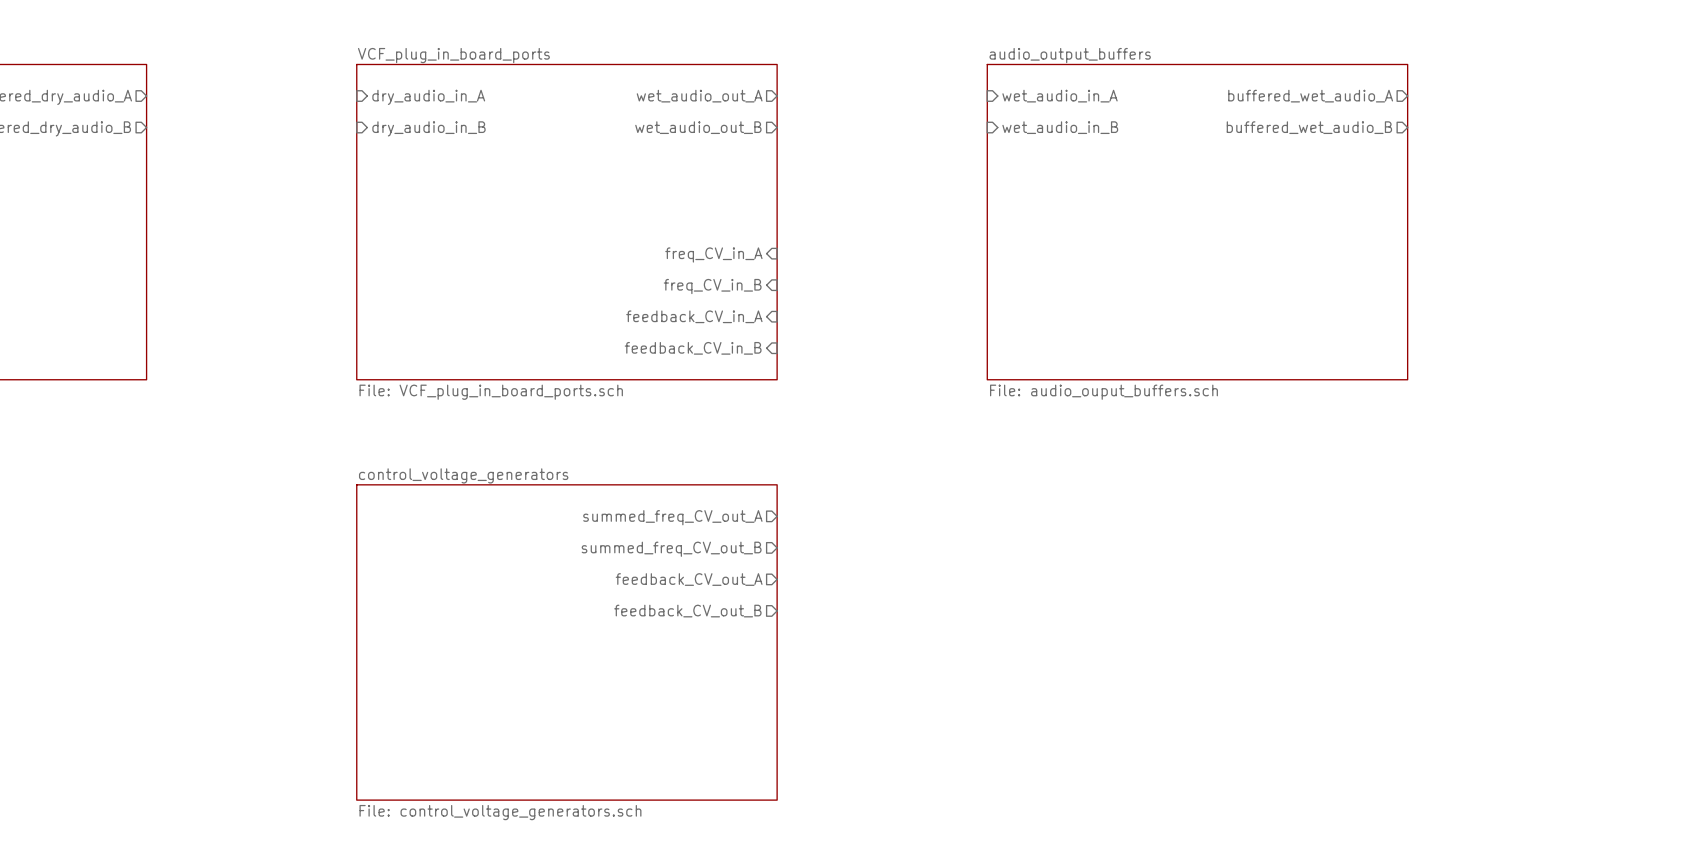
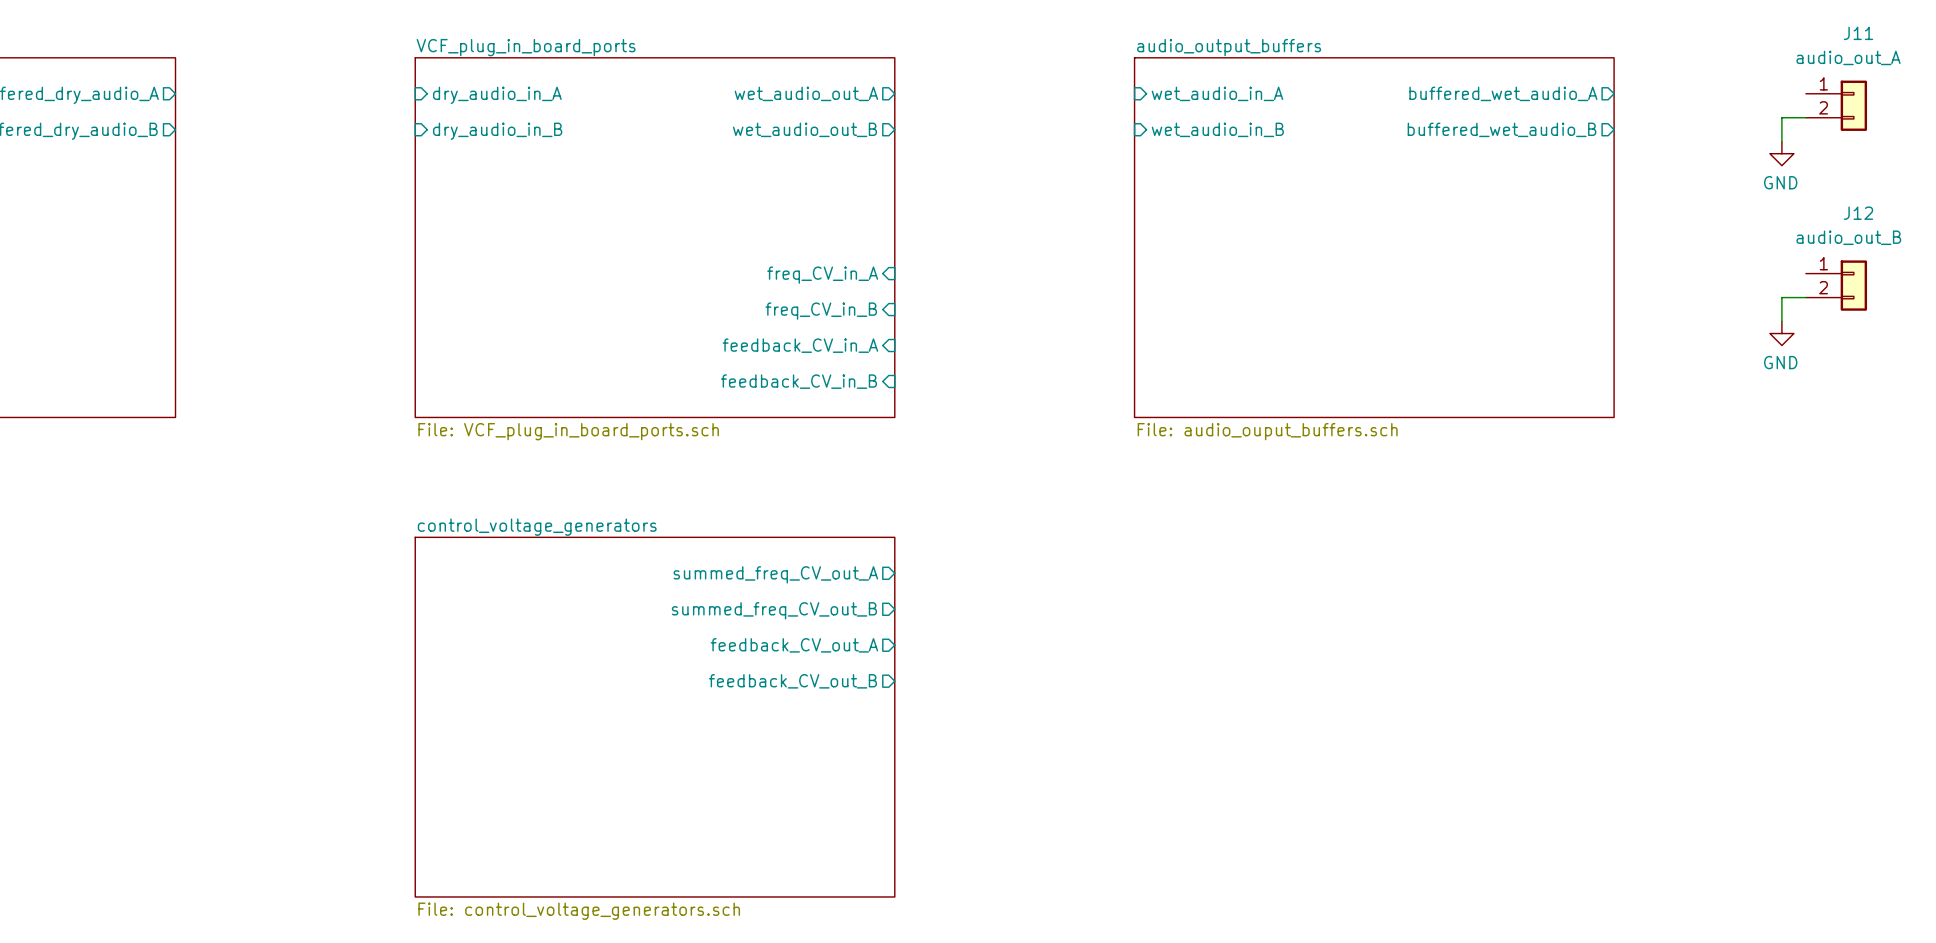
J11: none -> audio_out_A (1836, 105)
wire: none -> (1805, 117) (1781, 117) (1781, 141)
power symbol: none -> GND (1781, 153)
J12: none -> audio_out_B (1836, 285)
wire: none -> (1805, 297) (1781, 297) (1781, 321)
power symbol: none -> GND (1781, 333)

